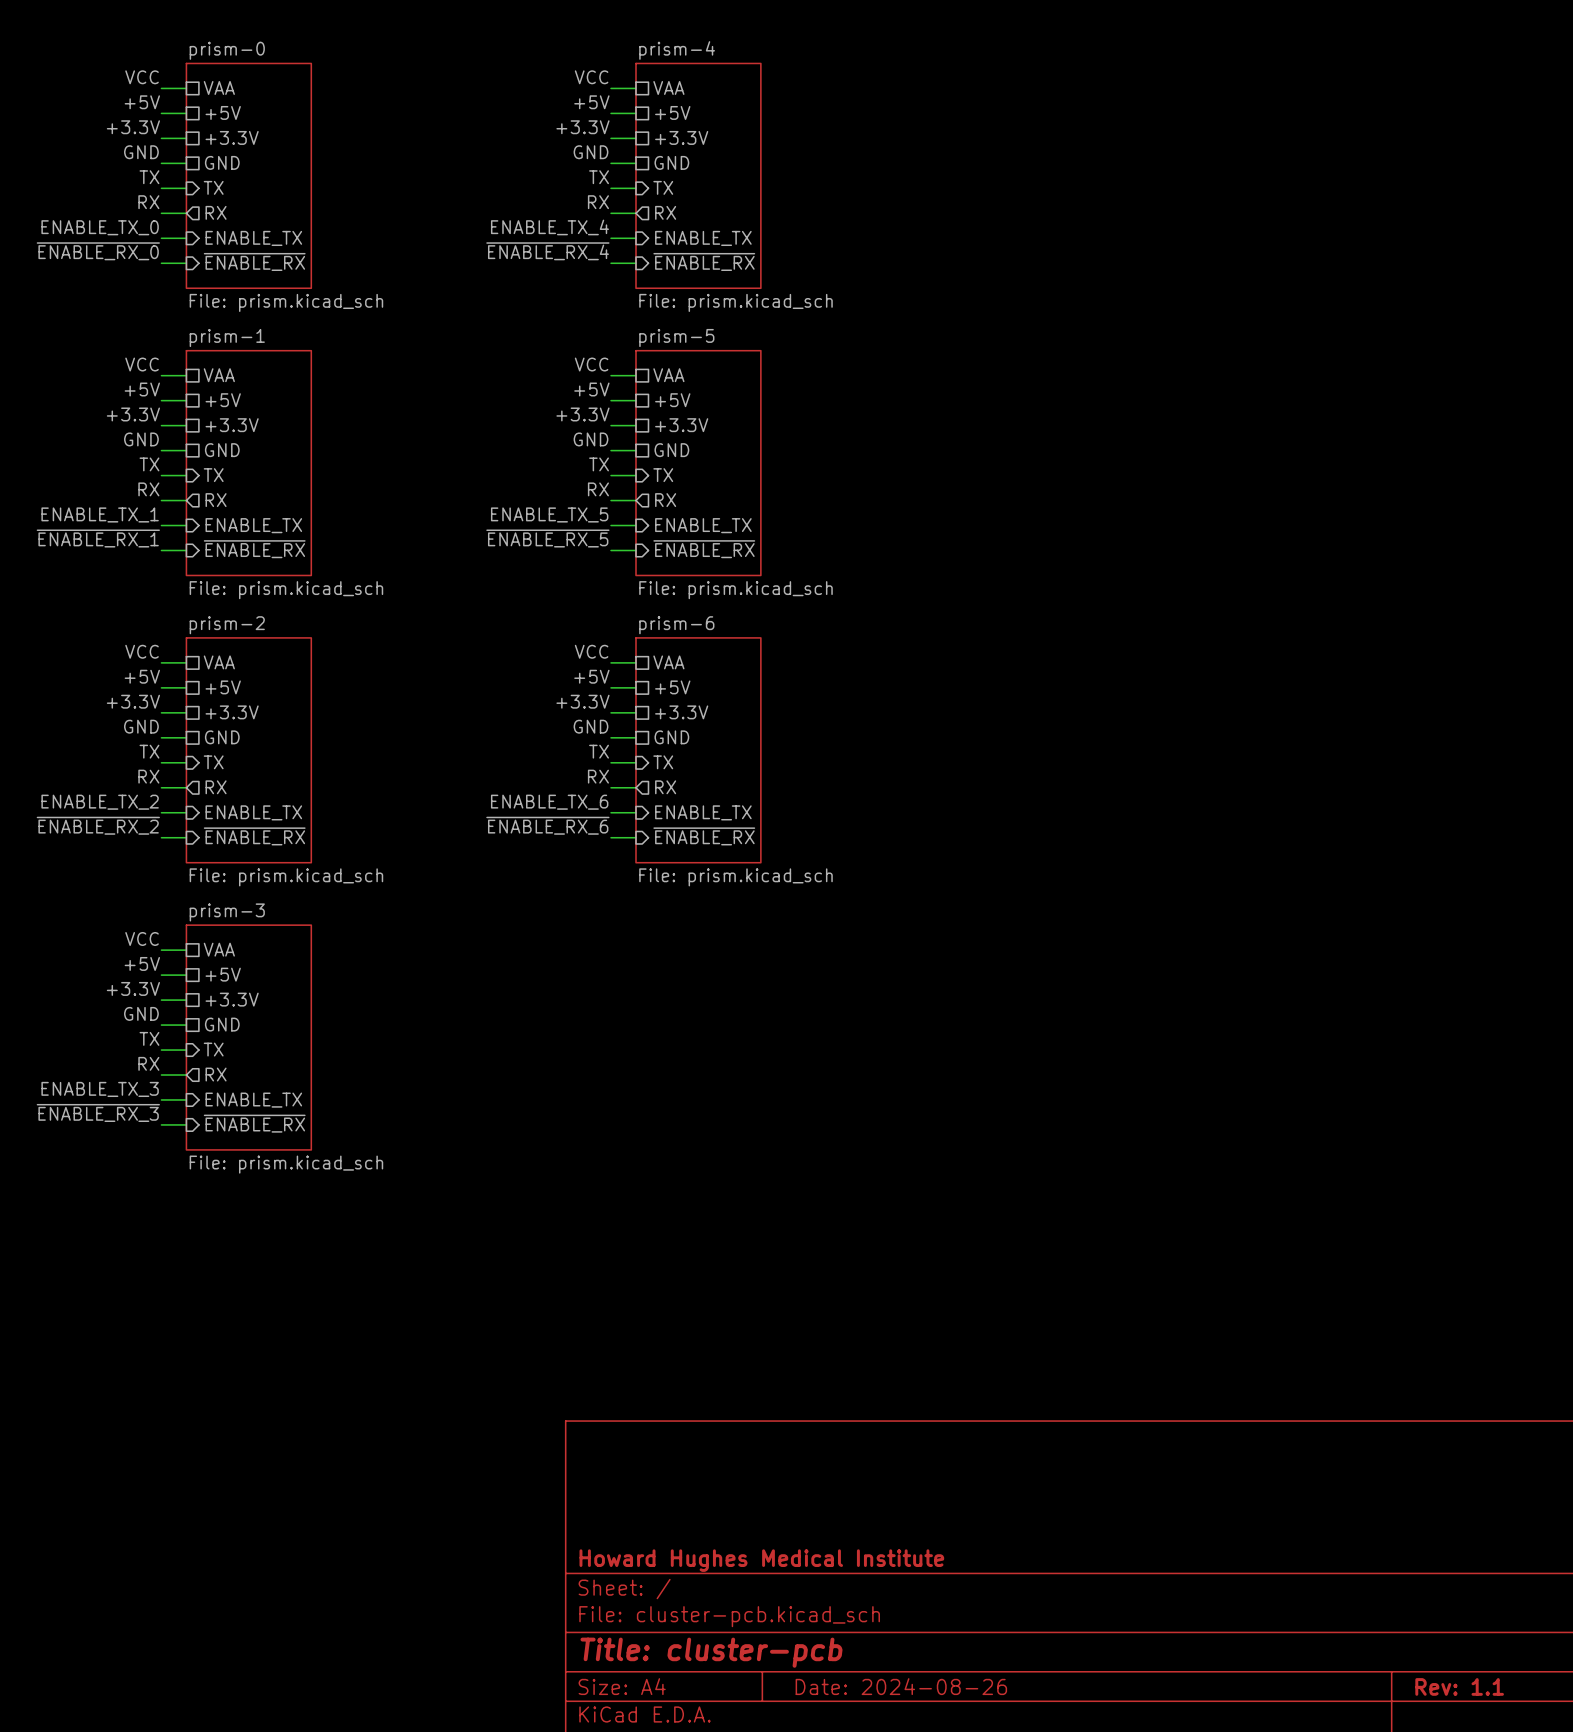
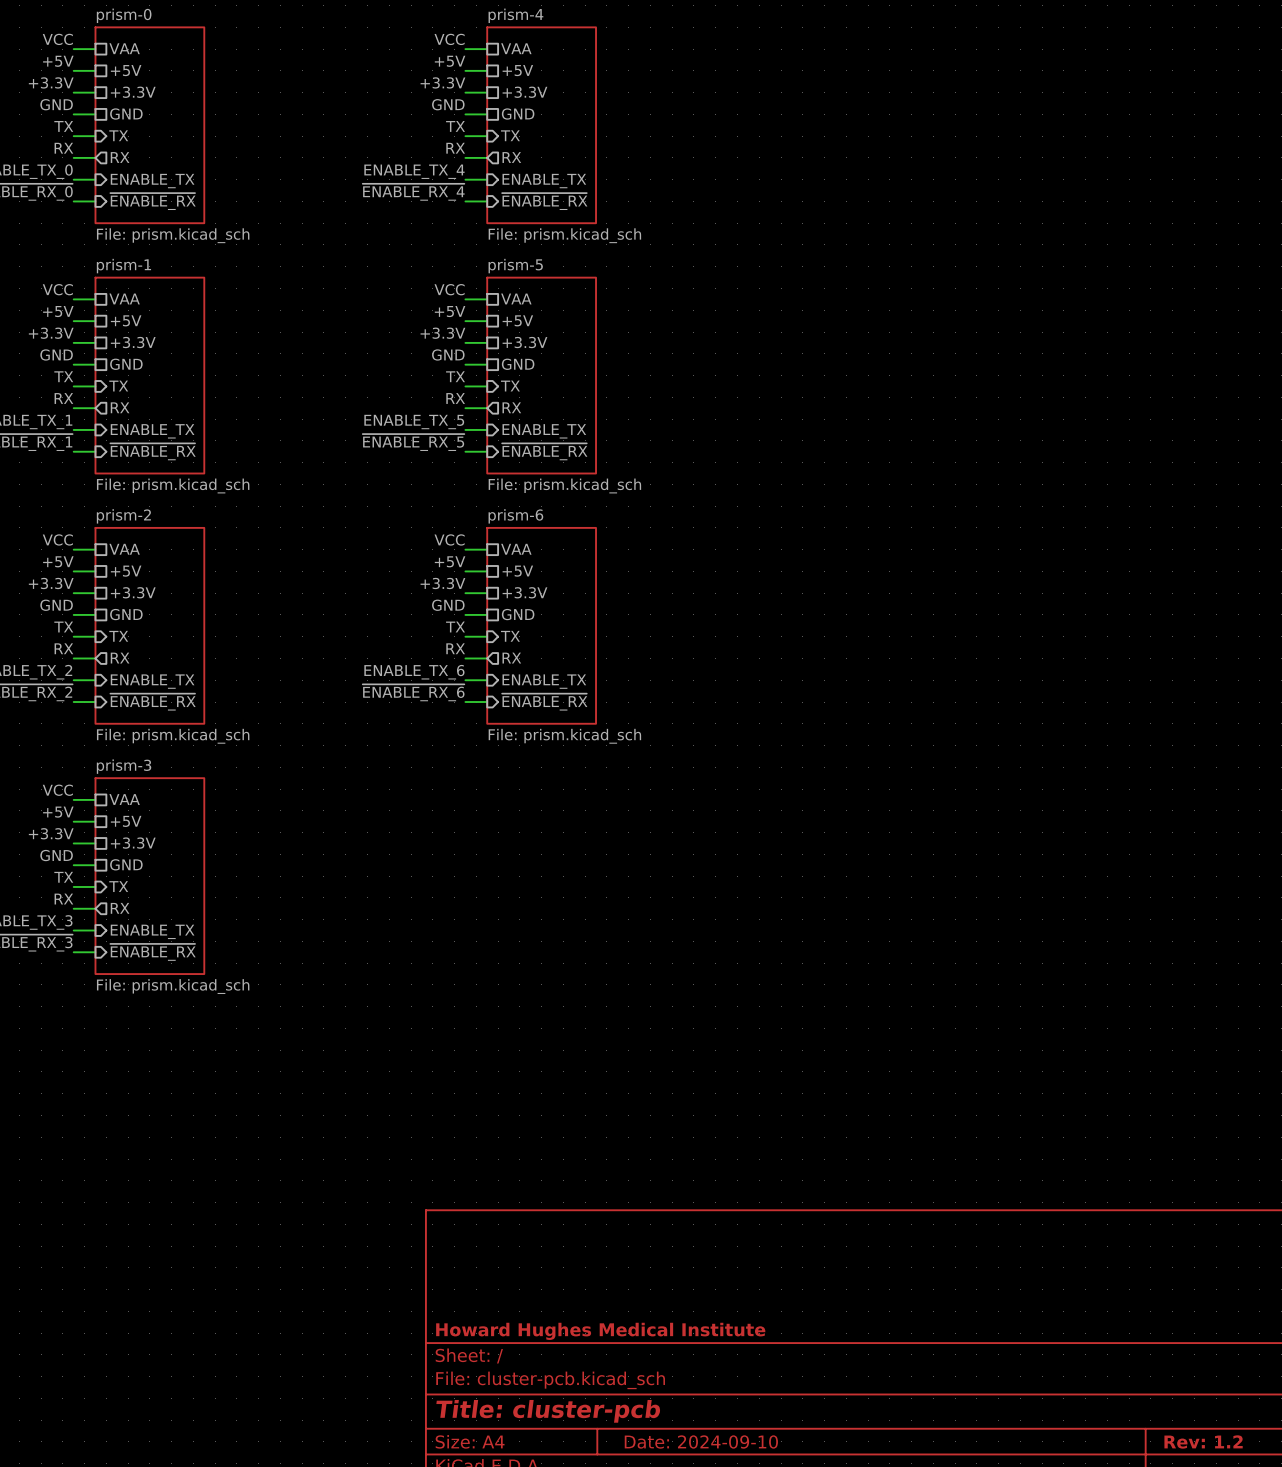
title block: Date: 2024-08-26 (901, 1686) -> Date: 2024-09-10 (701, 1441)
title block: Rev: 1.1 (1459, 1686) -> Rev: 1.2 (1203, 1441)

